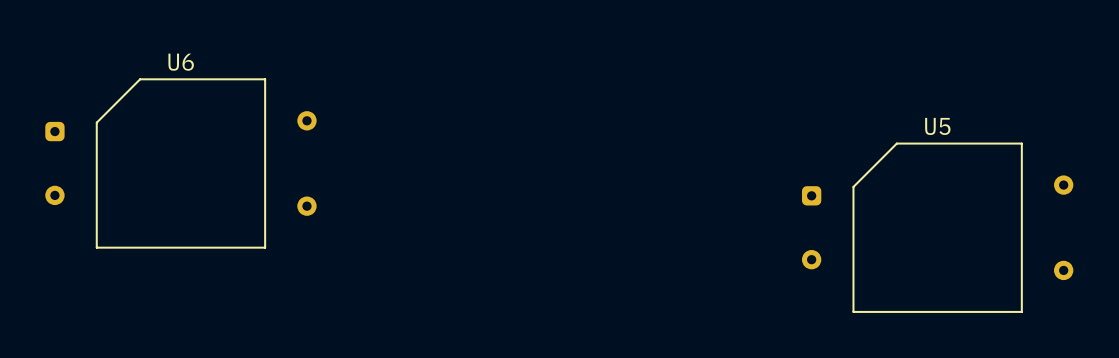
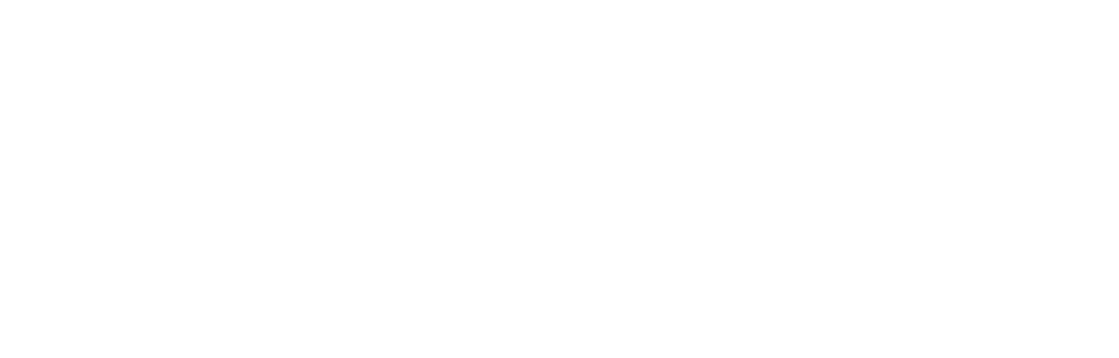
U6: (180, 163) -> none
U5: (937, 227) -> none

